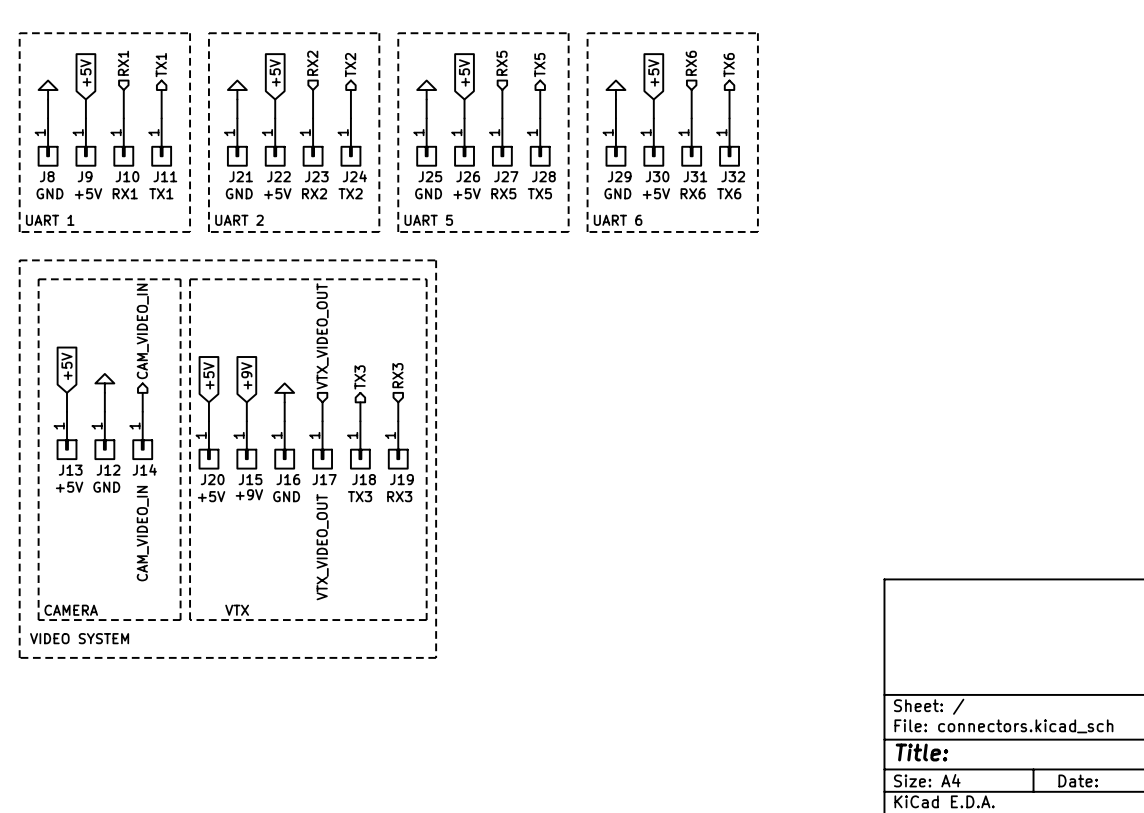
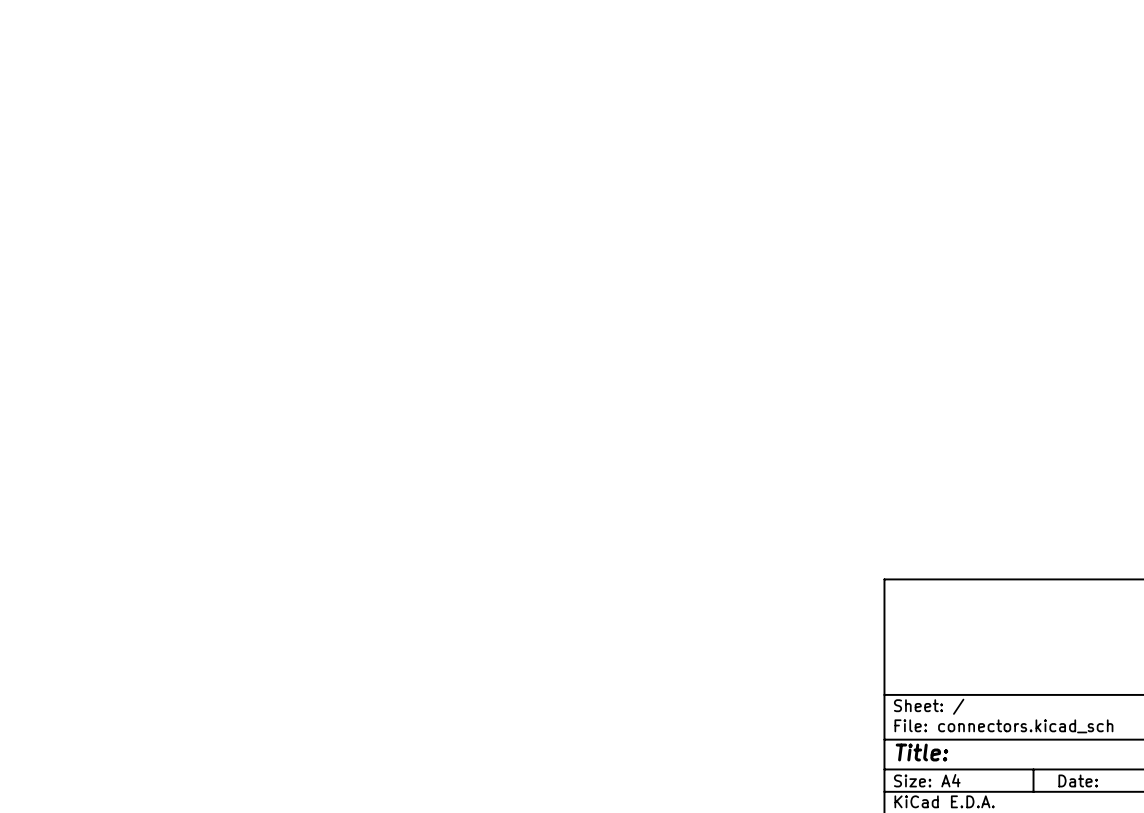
line: (19, 33) (19, 231) (190, 231) (190, 33) (19, 33) -> none
line: (208, 33) (379, 33) (379, 231) (208, 231) (208, 33) -> none
line: (398, 33) (568, 33) (568, 231) (398, 231) (398, 33) -> none
line: (587, 33) (757, 33) (757, 231) (587, 231) (587, 33) -> none
hierarchical label: RX1 (123, 63) -> none
hierarchical label: RX2 (312, 63) -> none
hierarchical label: RX5 (502, 63) -> none
hierarchical label: RX6 (691, 63) -> none
hierarchical label: TX1 (161, 65) -> none
hierarchical label: TX2 (350, 65) -> none
hierarchical label: TX5 (539, 65) -> none
hierarchical label: TX6 (729, 65) -> none
global label: +5V (85, 72) -> none
global label: +5V (275, 72) -> none
global label: +5V (464, 72) -> none
global label: +5V (653, 72) -> none
power symbol: (48, 90) -> none
wire: (123, 90) (123, 118) -> none
wire: (161, 90) (161, 118) -> none
power symbol: (237, 90) -> none
wire: (313, 90) (313, 118) -> none
wire: (350, 90) (350, 118) -> none
power symbol: (426, 90) -> none
wire: (502, 90) (502, 118) -> none
wire: (540, 90) (540, 118) -> none
power symbol: (615, 90) -> none
wire: (691, 90) (691, 118) -> none
wire: (729, 90) (729, 118) -> none
wire: (48, 99) (48, 118) -> none
wire: (85, 99) (85, 118) -> none
wire: (237, 99) (237, 118) -> none
wire: (275, 99) (275, 118) -> none
wire: (426, 99) (426, 118) -> none
wire: (464, 99) (464, 118) -> none
wire: (615, 99) (615, 118) -> none
wire: (653, 99) (653, 118) -> none
J8: GND (48, 142) -> none
J9: +5V (85, 142) -> none
J10: RX1 (123, 142) -> none
J11: TX1 (161, 142) -> none
J21: GND (237, 142) -> none
J22: +5V (275, 142) -> none
J23: RX2 (313, 142) -> none
J24: TX2 (350, 142) -> none
J25: GND (426, 142) -> none
J26: +5V (464, 142) -> none
J27: RX5 (502, 142) -> none
J28: TX5 (540, 142) -> none
J29: GND (615, 142) -> none
J30: +5V (653, 142) -> none
J31: RX6 (691, 142) -> none
J32: TX6 (729, 142) -> none
text: UART 1 (50, 220) -> none
text: UART 2 (239, 220) -> none
text: UART 5 (428, 220) -> none
text: UART 6 (618, 220) -> none
line: (19, 260) (436, 260) (436, 657) (19, 657) (19, 260) -> none
line: (38, 279) (180, 279) (180, 620) (38, 620) (38, 279) -> none
line: (190, 279) (426, 279) (426, 620) (190, 620) (190, 279) -> none
hierarchical label: CAM_VIDEO_IN (142, 331) -> none
hierarchical label: VTX_VIDEO_OUT (322, 336) -> none
global label: +5V (67, 366) -> none
global label: +5V (208, 375) -> none
global label: +9V (246, 375) -> none
hierarchical label: RX3 (397, 375) -> none
hierarchical label: TX3 (360, 377) -> none
power symbol: (104, 383) -> none
wire: (67, 392) (67, 411) -> none
wire: (104, 392) (104, 411) -> none
wire: (142, 392) (142, 411) -> none
power symbol: (284, 392) -> none
wire: (208, 402) (208, 421) -> none
wire: (246, 402) (246, 421) -> none
wire: (284, 402) (284, 421) -> none
wire: (322, 402) (322, 421) -> none
wire: (360, 402) (360, 421) -> none
wire: (398, 402) (398, 421) -> none
J13: +5V (67, 435) -> none
J12: GND (104, 435) -> none
J14: CAM_VIDEO_IN (142, 435) -> none
J20: +5V (208, 445) -> none
J15: +9V (246, 445) -> none
J16: GND (284, 445) -> none
J17: VTX_VIDEO_OUT (322, 445) -> none
J18: TX3 (360, 445) -> none
J19: RX3 (398, 445) -> none
text: CAMERA (71, 610) -> none
text: VTX (237, 610) -> none
text: VIDEO SYSTEM (79, 638) -> none

